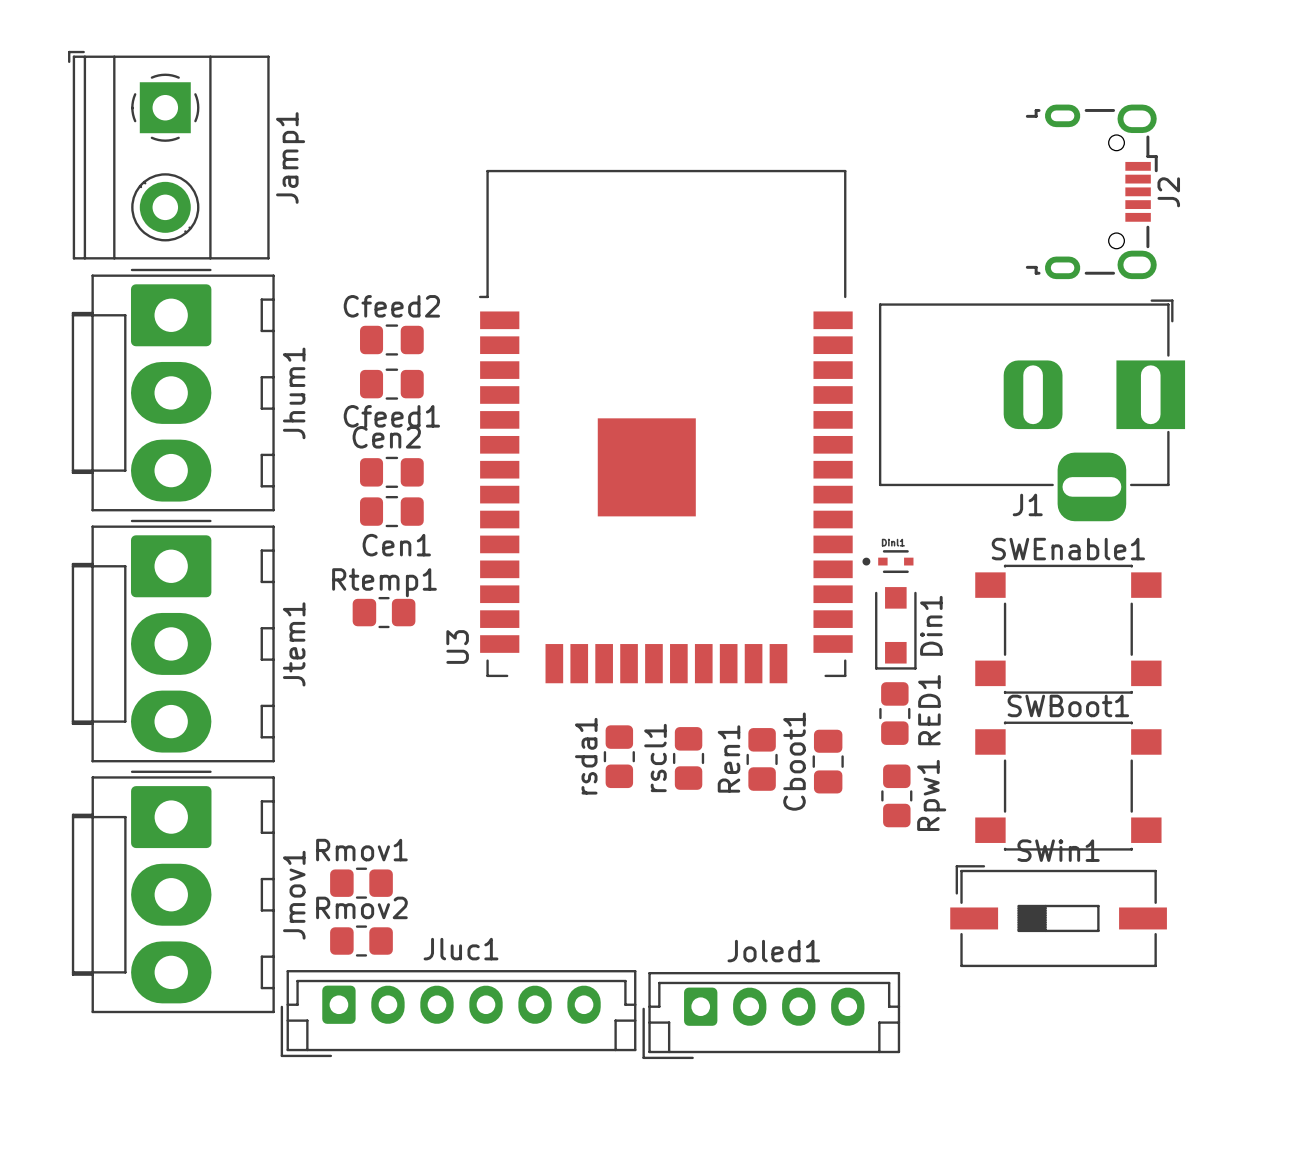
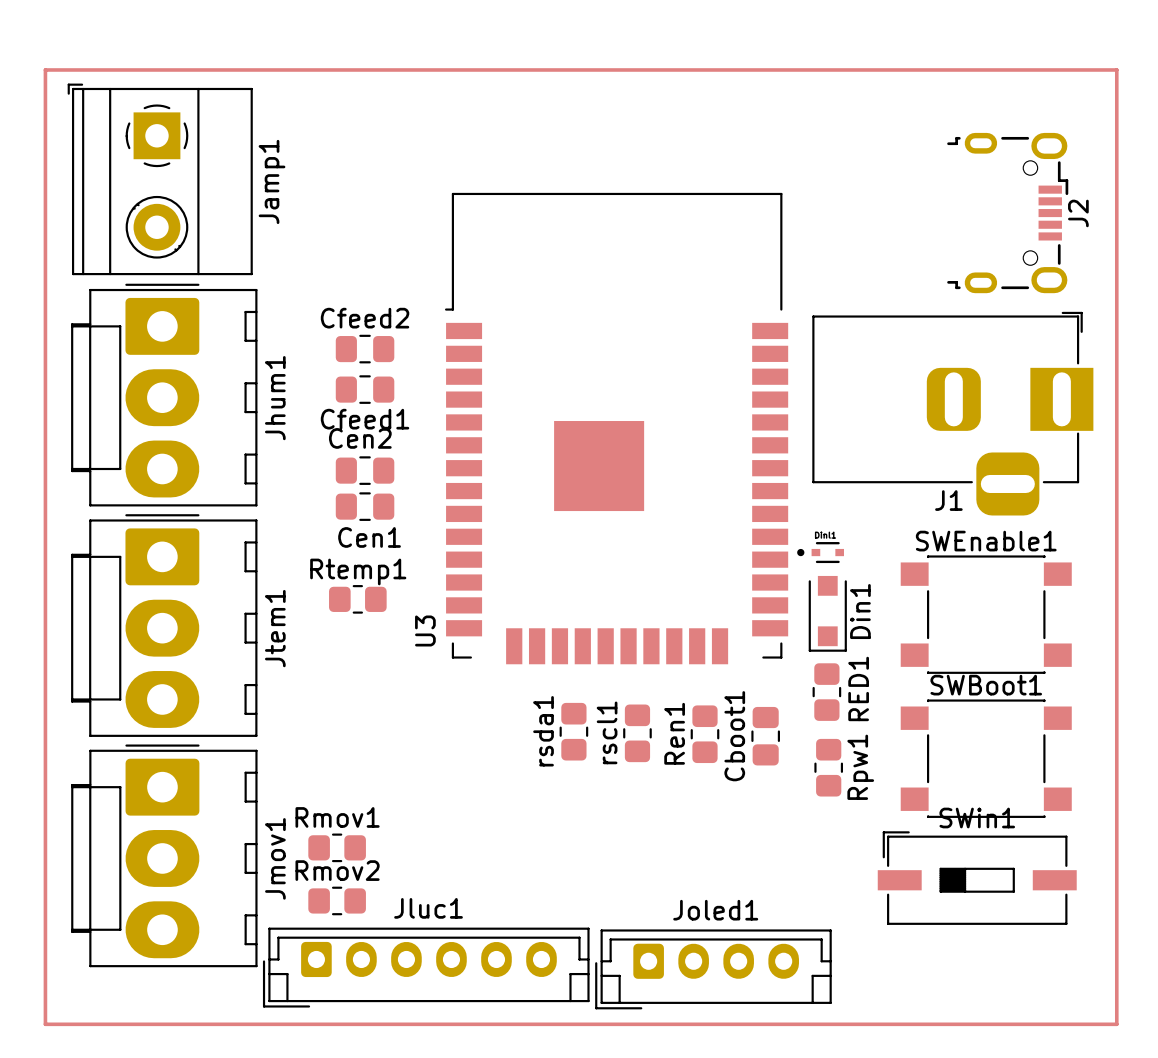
track: none -> (45, 69) (1116, 69) (1116, 1024) (45, 1024) (45, 69)

